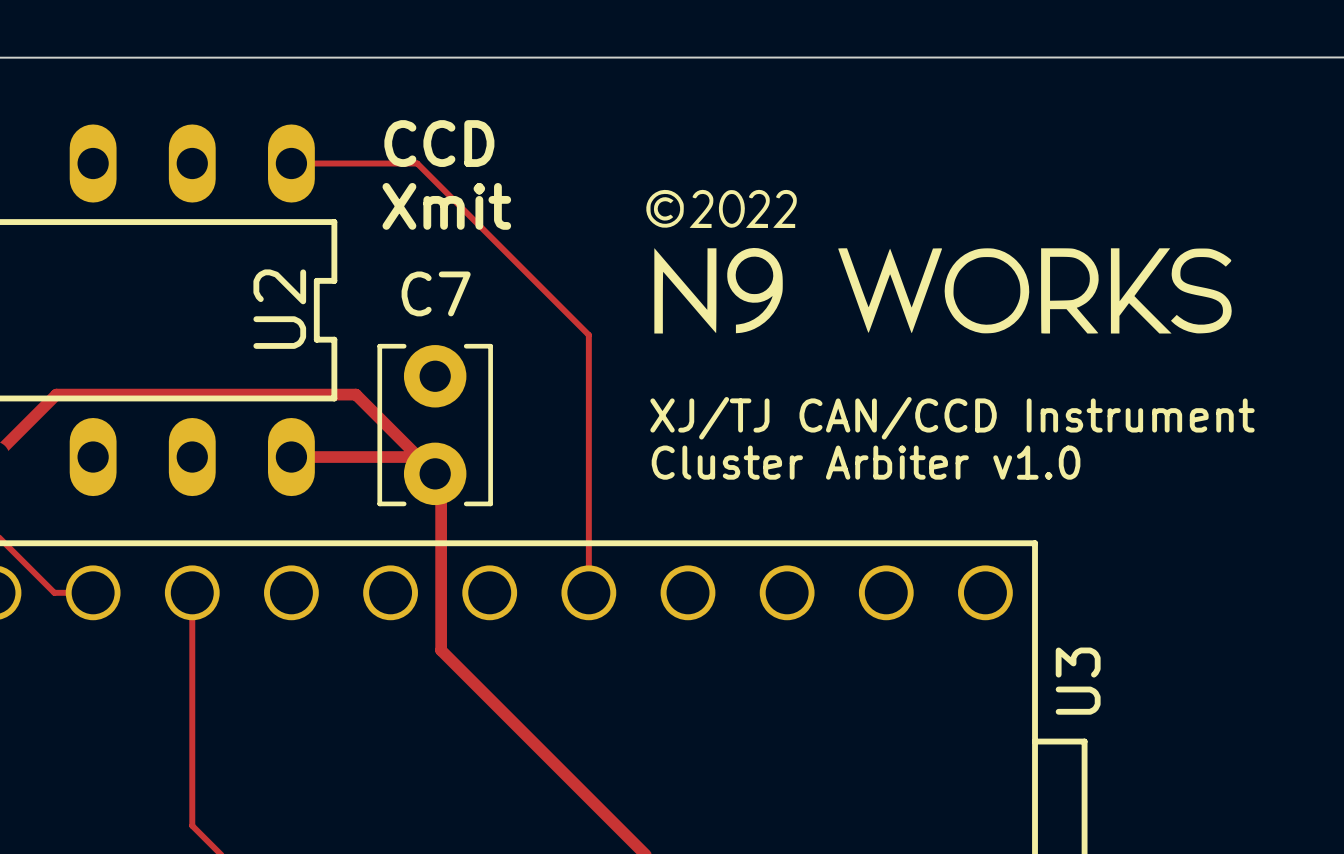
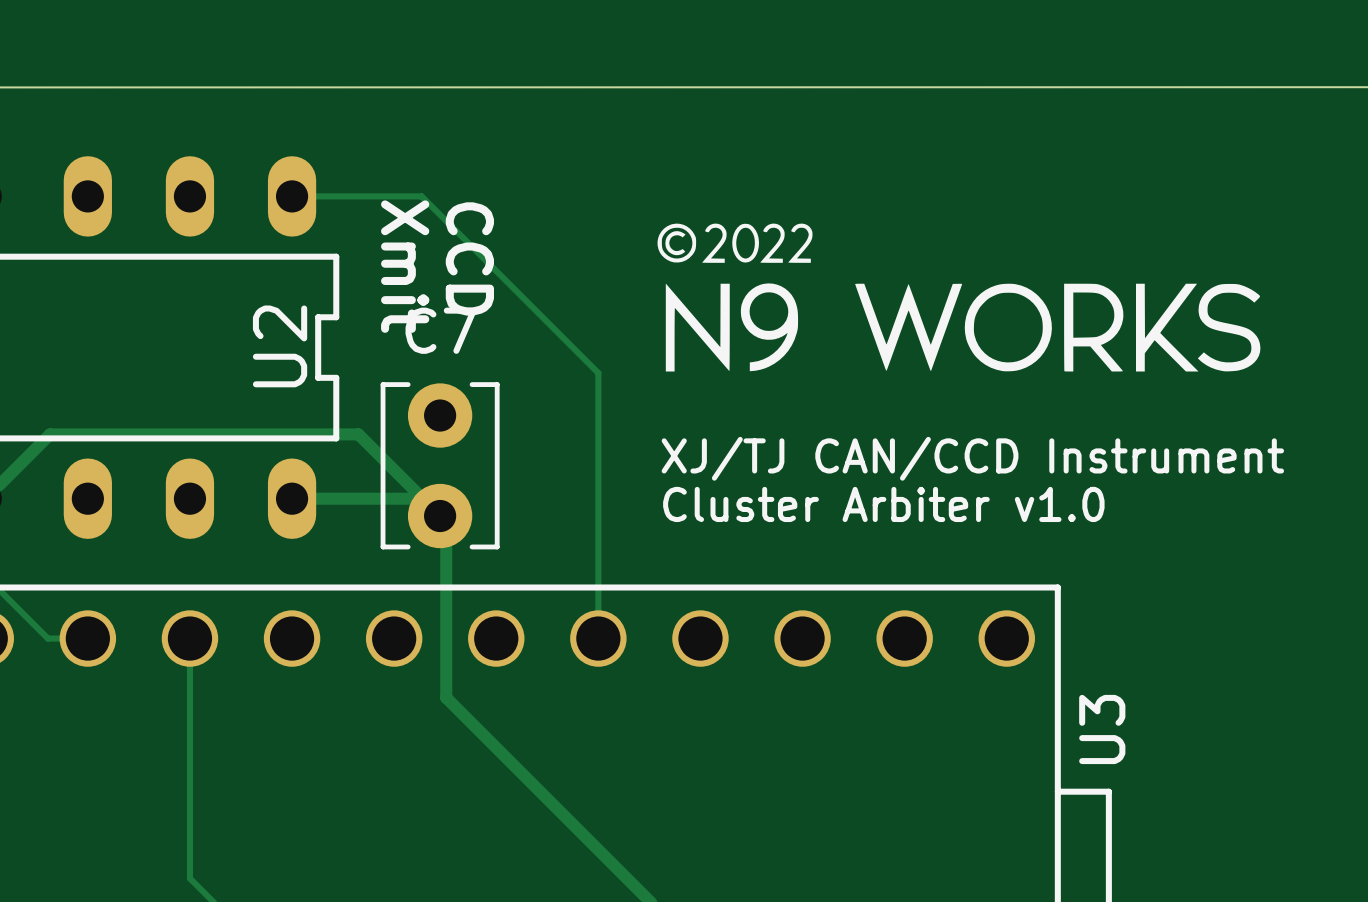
text rotation: 0° (439, 143) -> 90° clockwise (469, 258)
text rotation: 0° (446, 206) -> 90° clockwise (405, 266)

